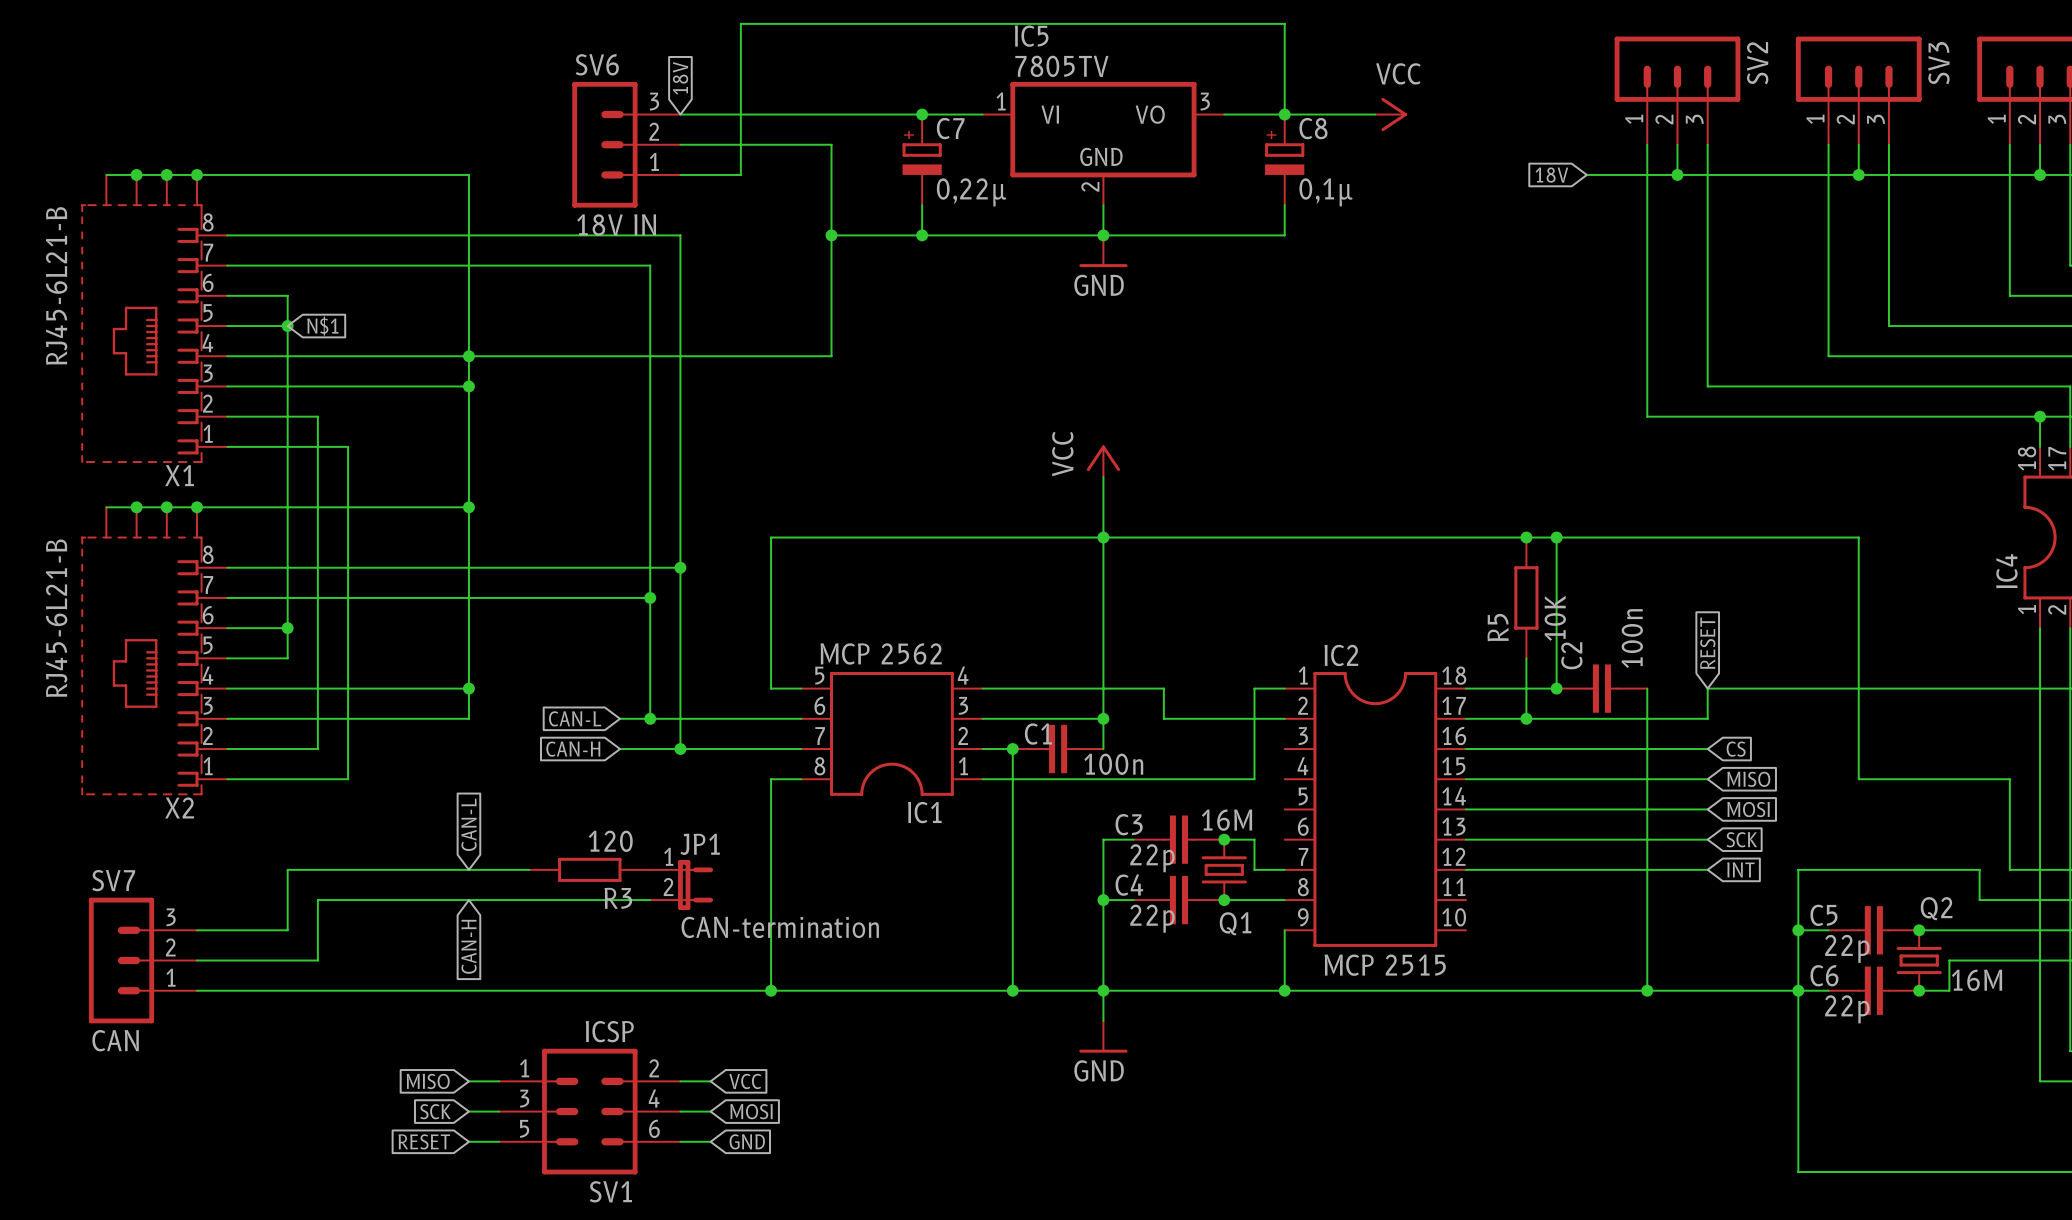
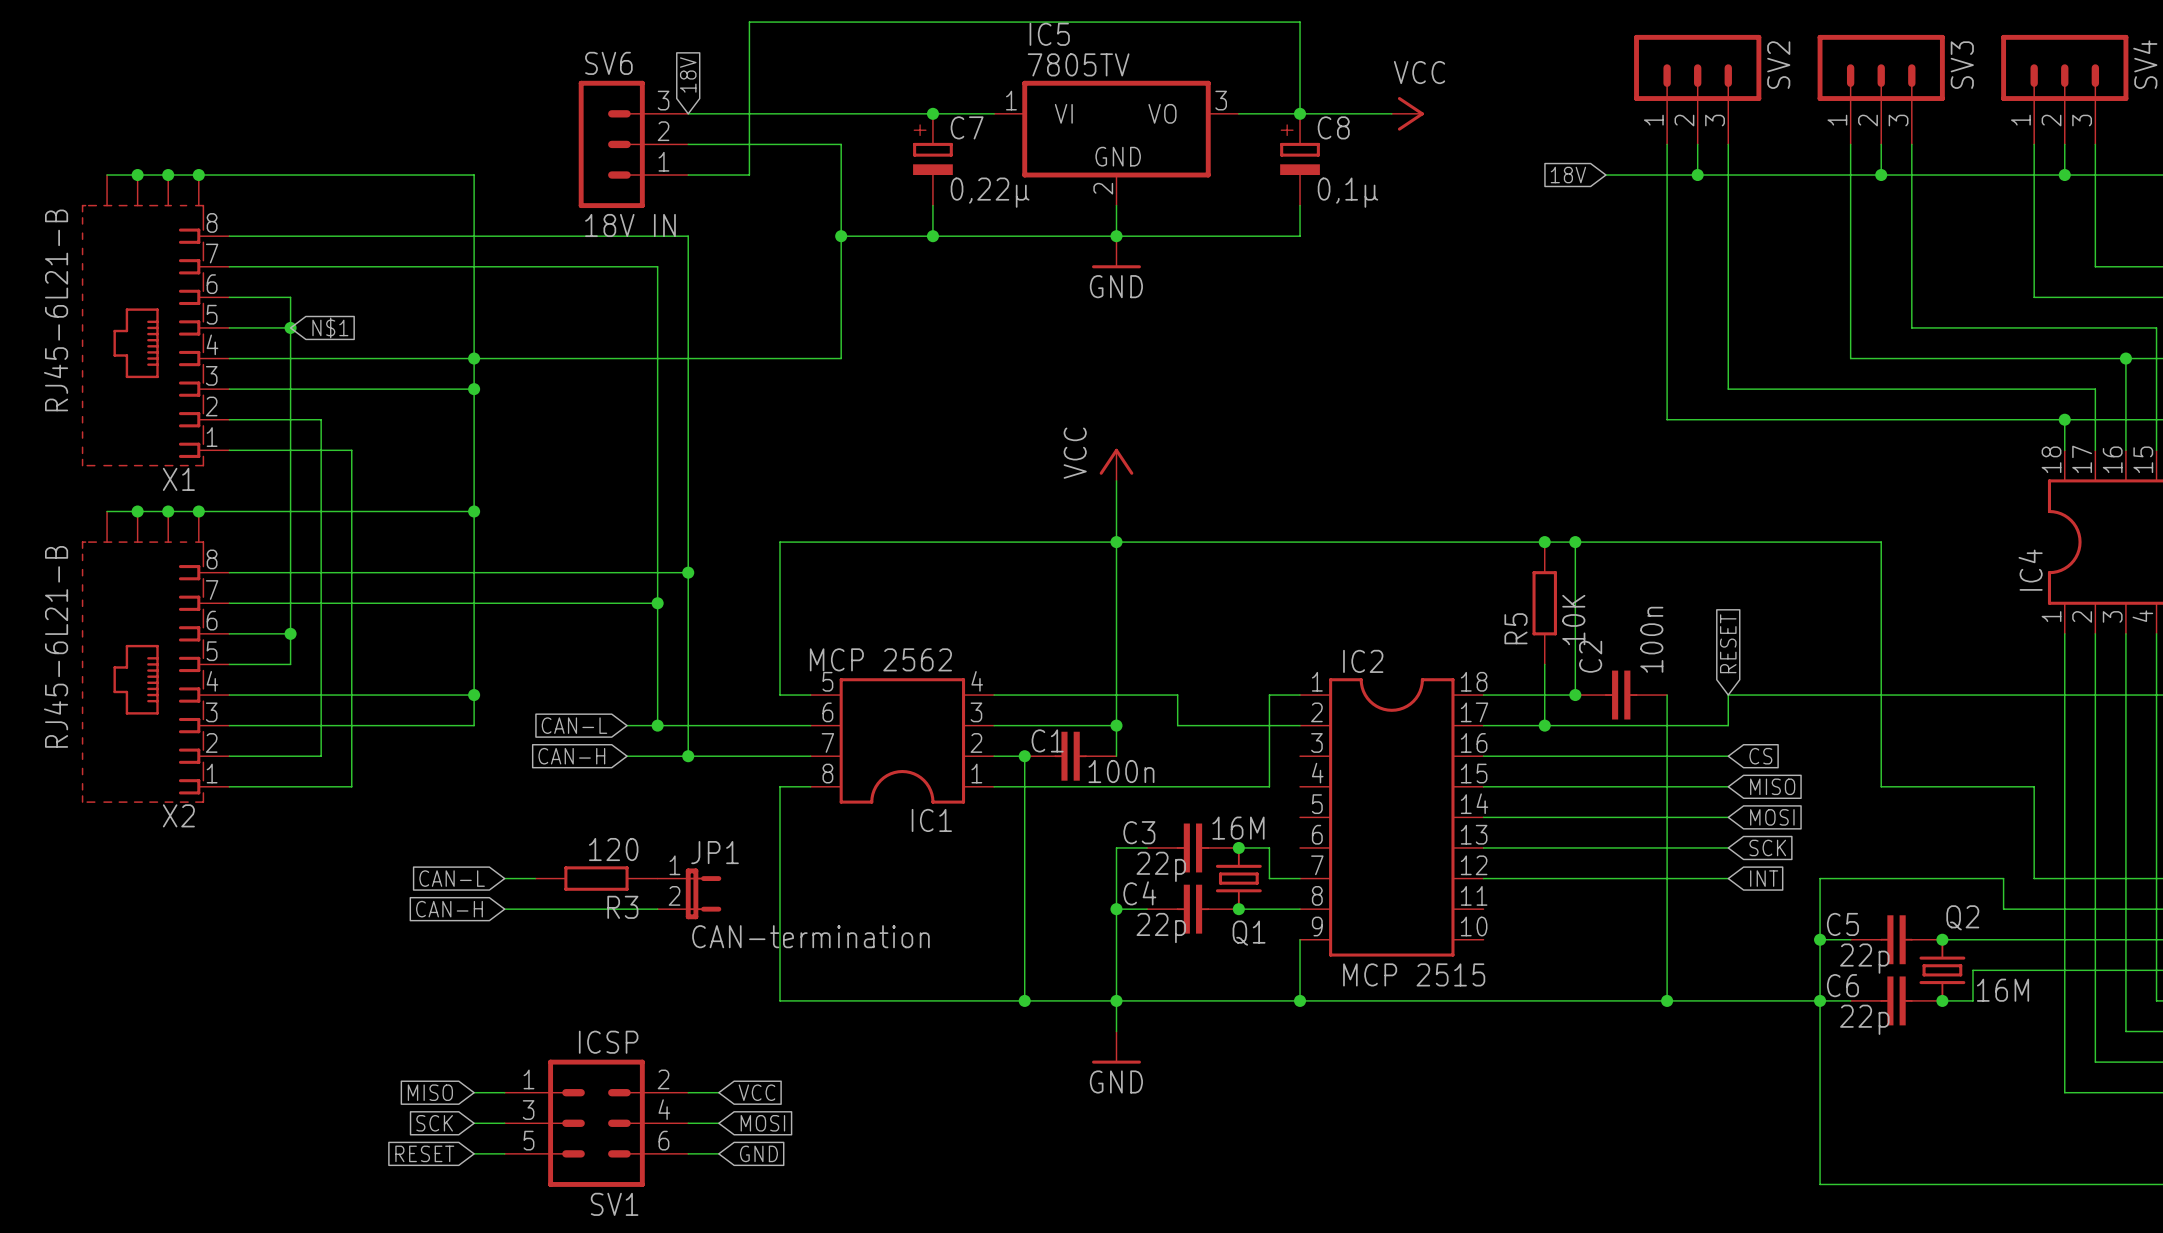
global label rotation: 0° (469, 824) -> 90° counterclockwise (452, 878)
wire: (499, 869) (287, 869) (287, 930) (197, 930) -> none
wire: (499, 900) (317, 900) (317, 960) (197, 960) -> none
global label rotation: 0° (469, 946) -> 90° clockwise (449, 909)
SV7: CAN (142, 960) -> none
wire: (197, 990) (771, 990) -> none
junction: (771, 990) -> none

